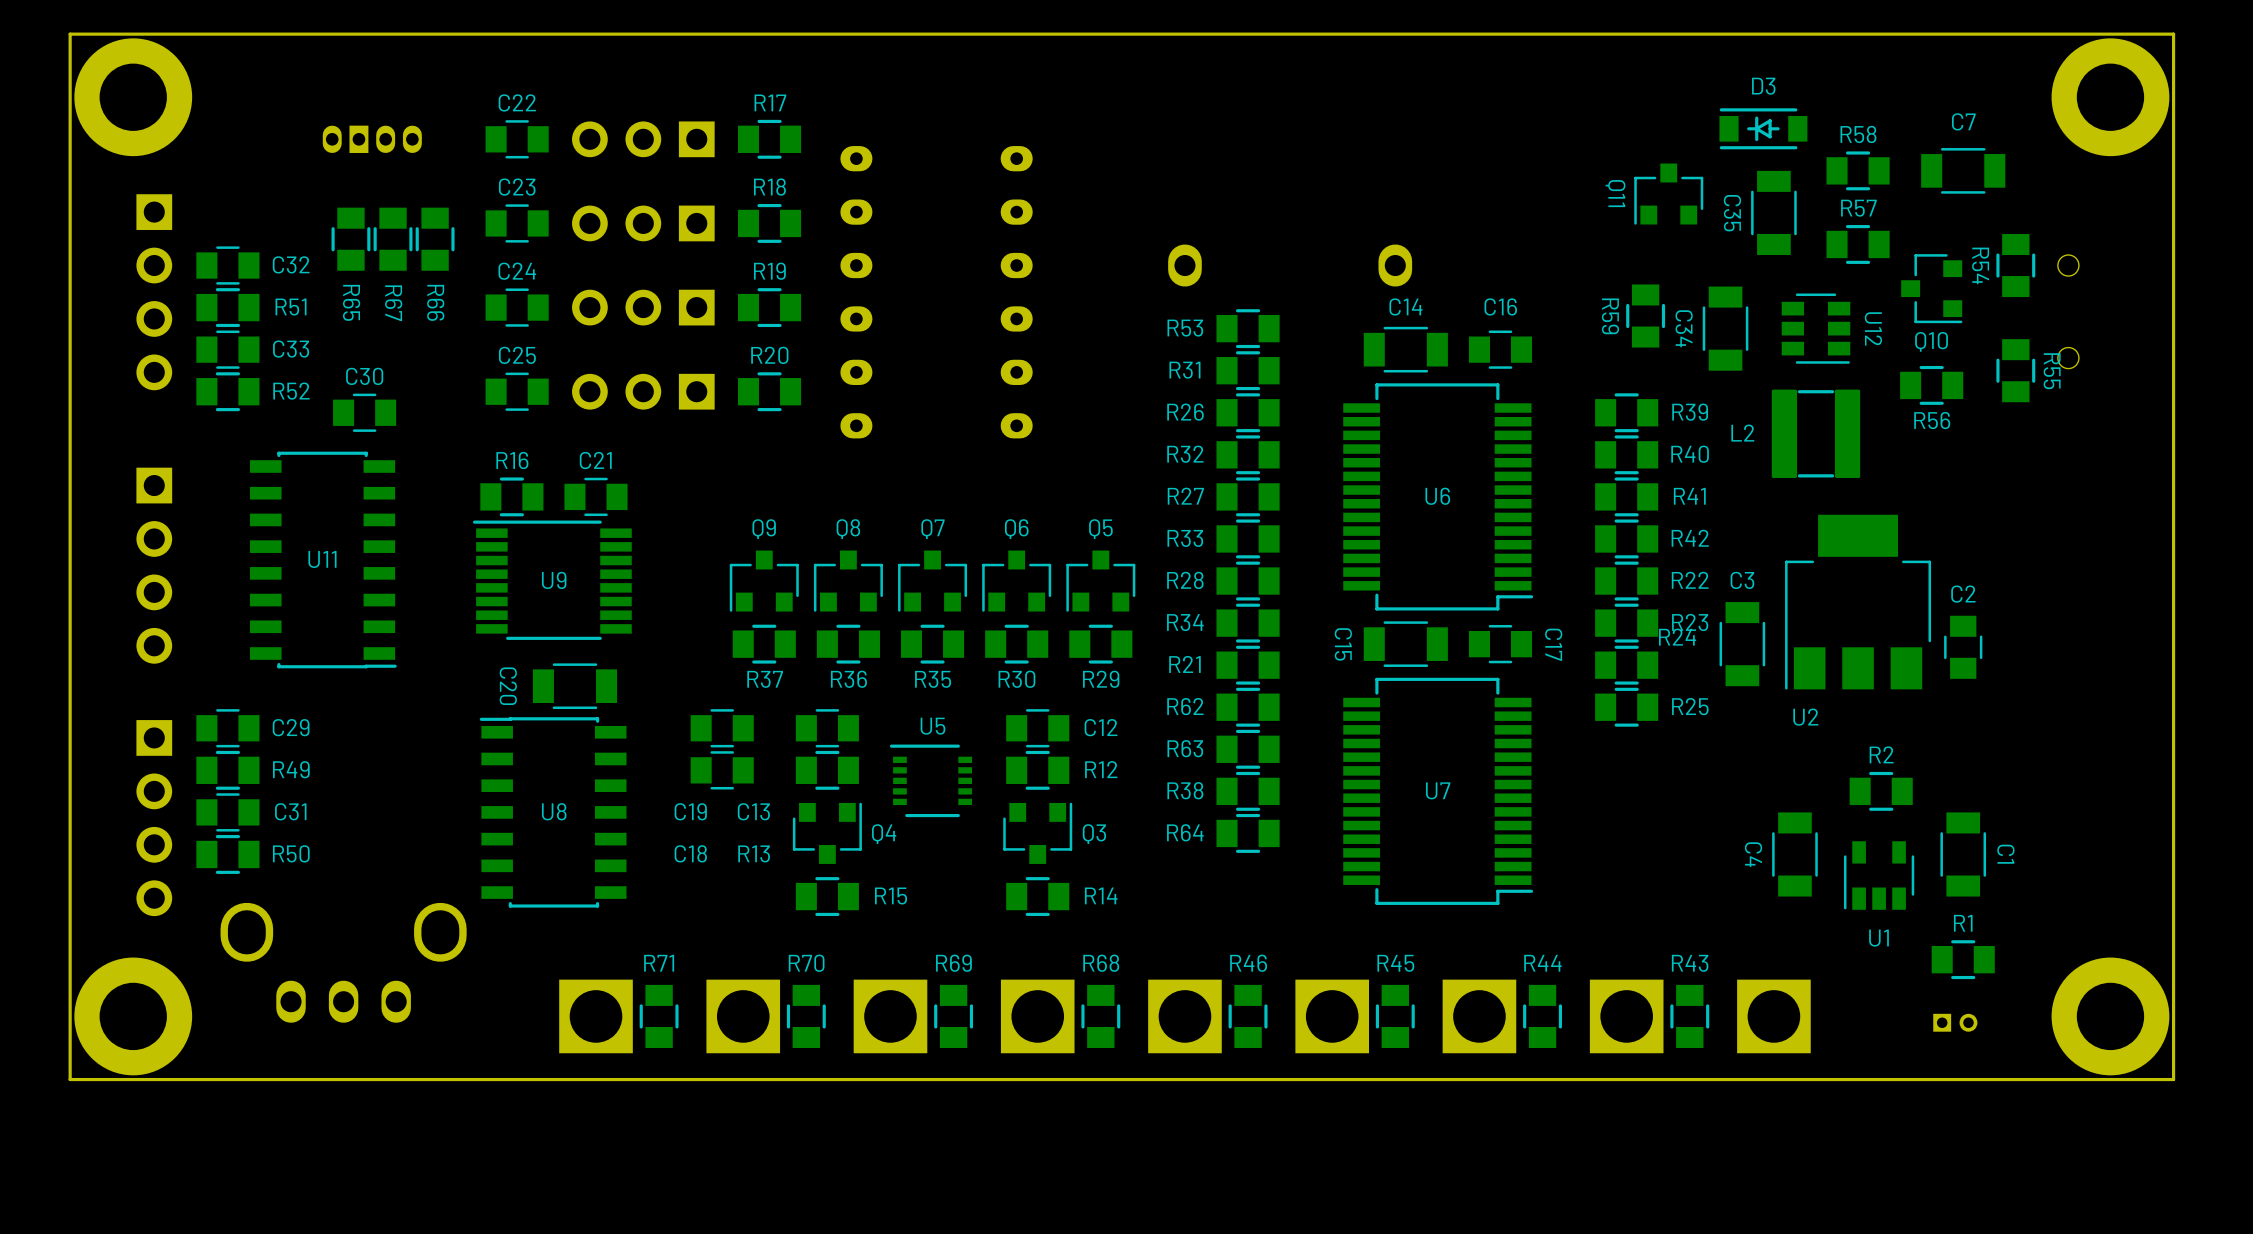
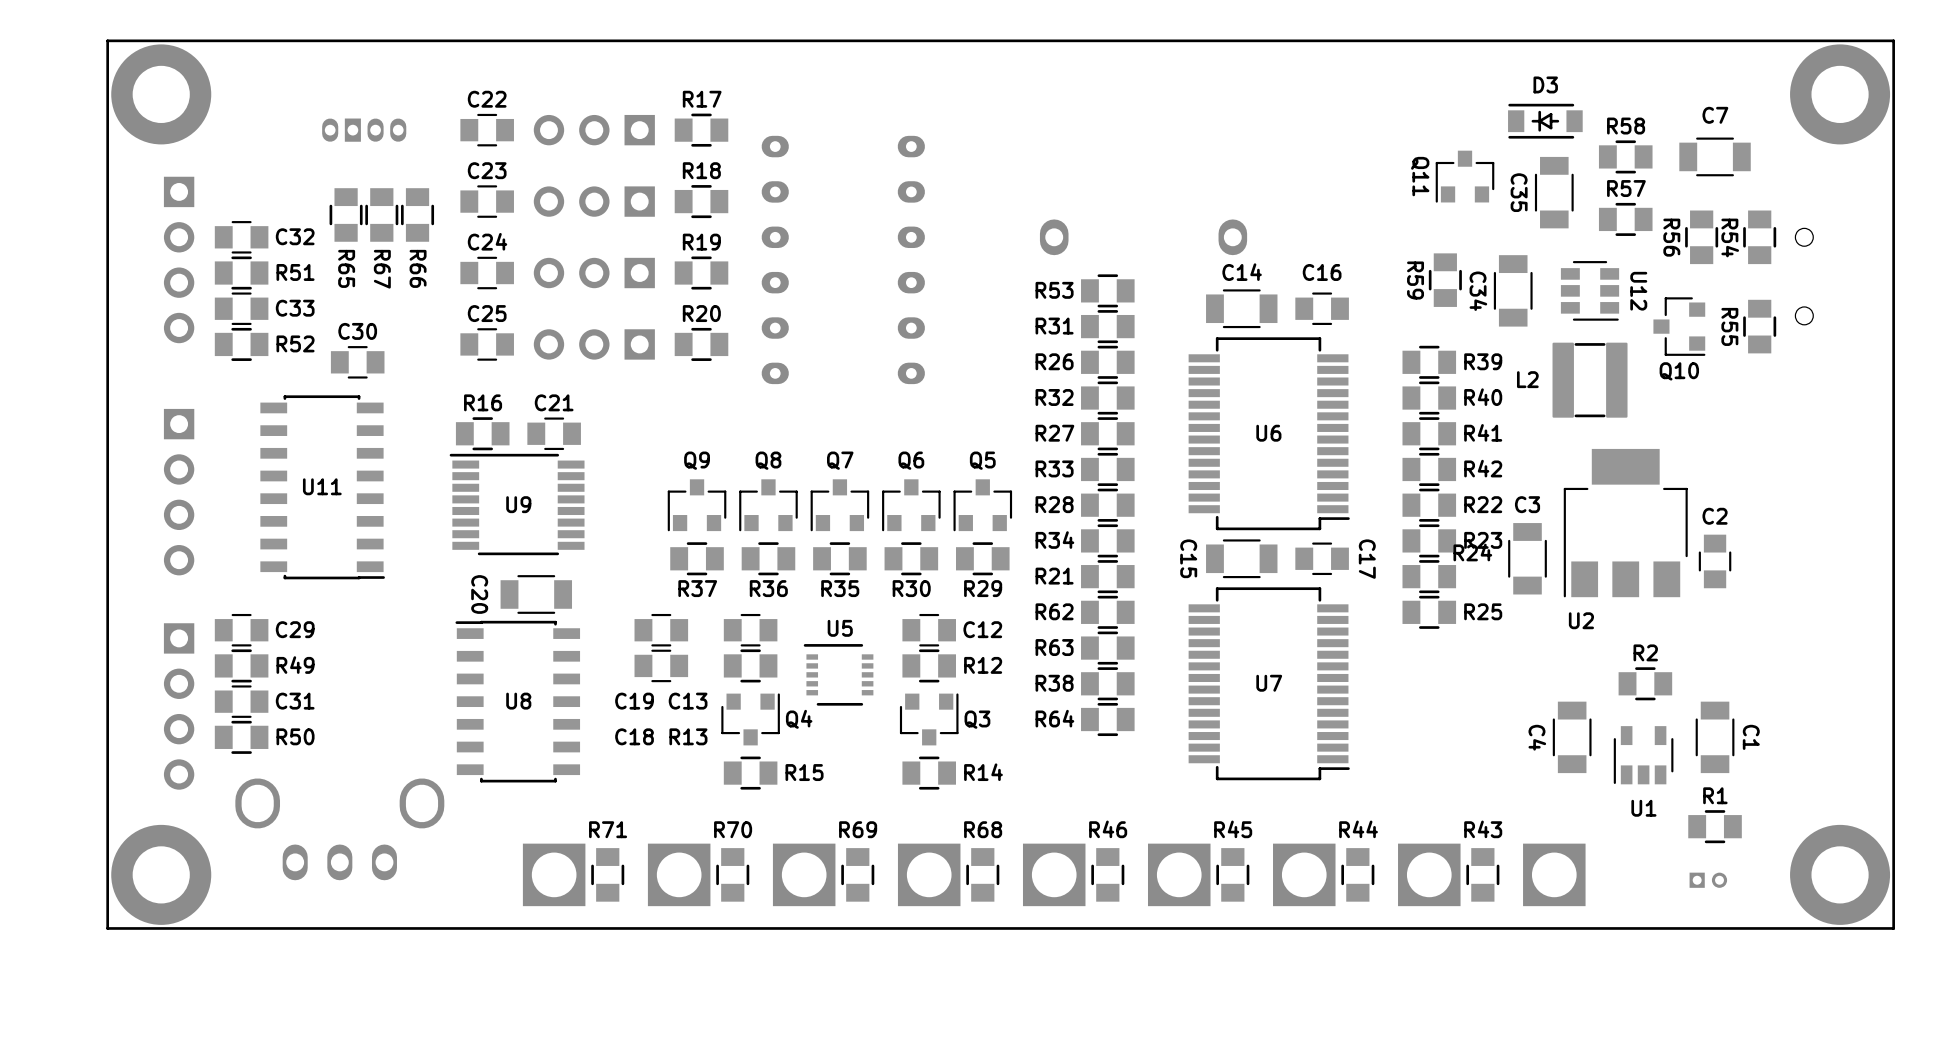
Q10 position: (1931, 288) -> (1679, 326)
R55 name position: R55 (2052, 371) -> R55 (1729, 326)
R56 rotation: 0° (1931, 385) -> 90° clockwise (1701, 237)
R56 position: (1931, 385) -> (1701, 237)

